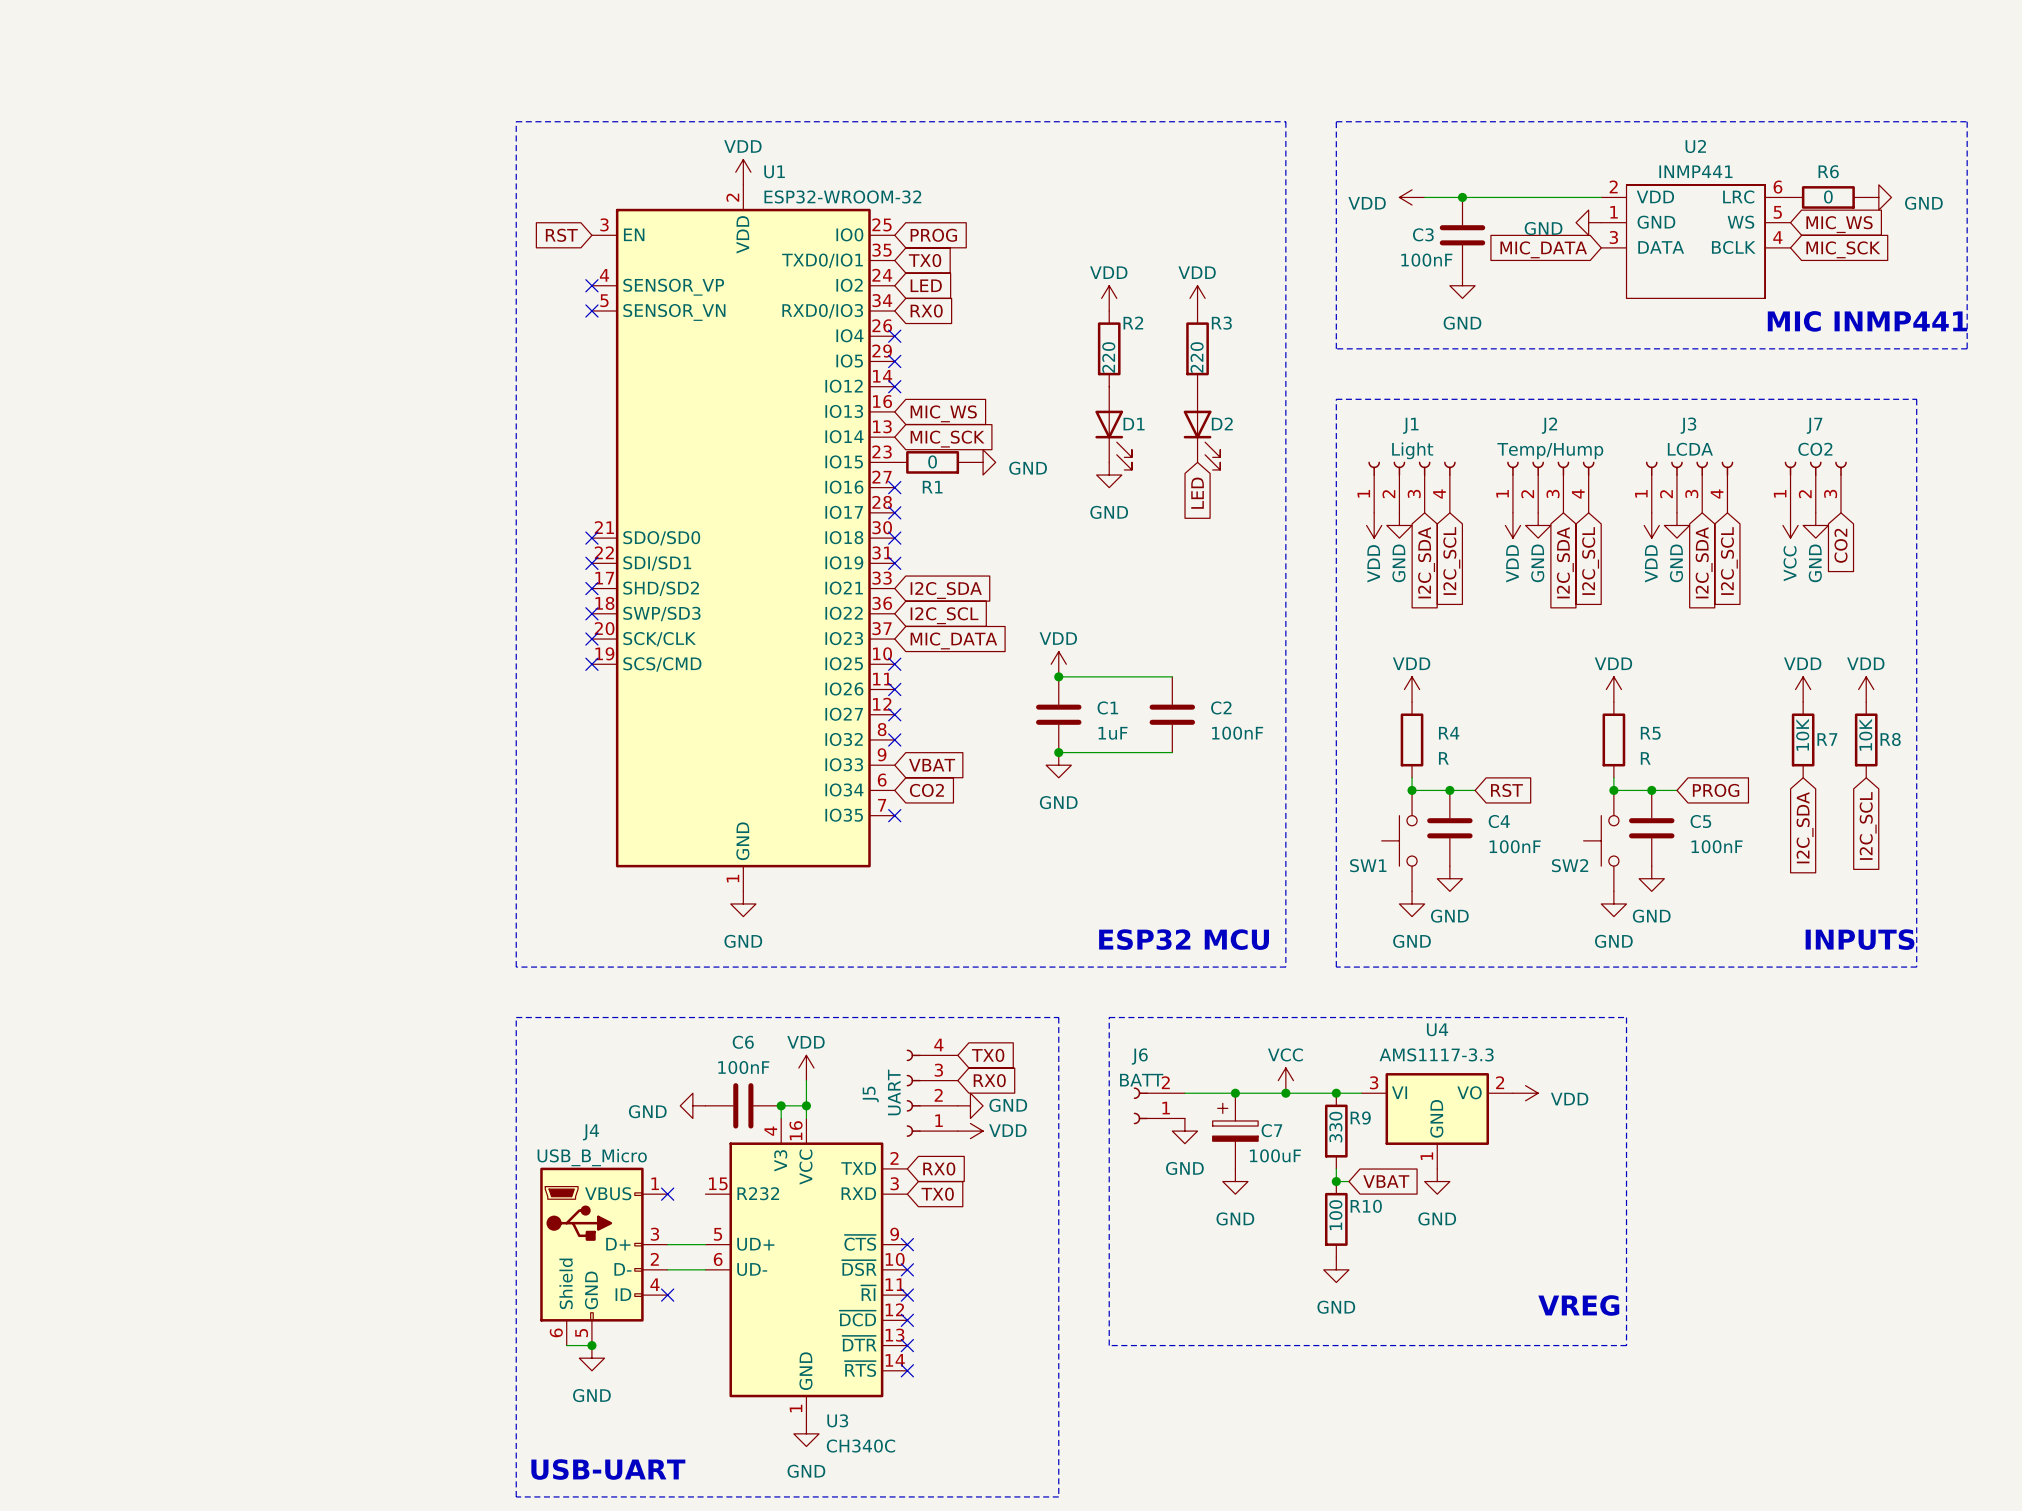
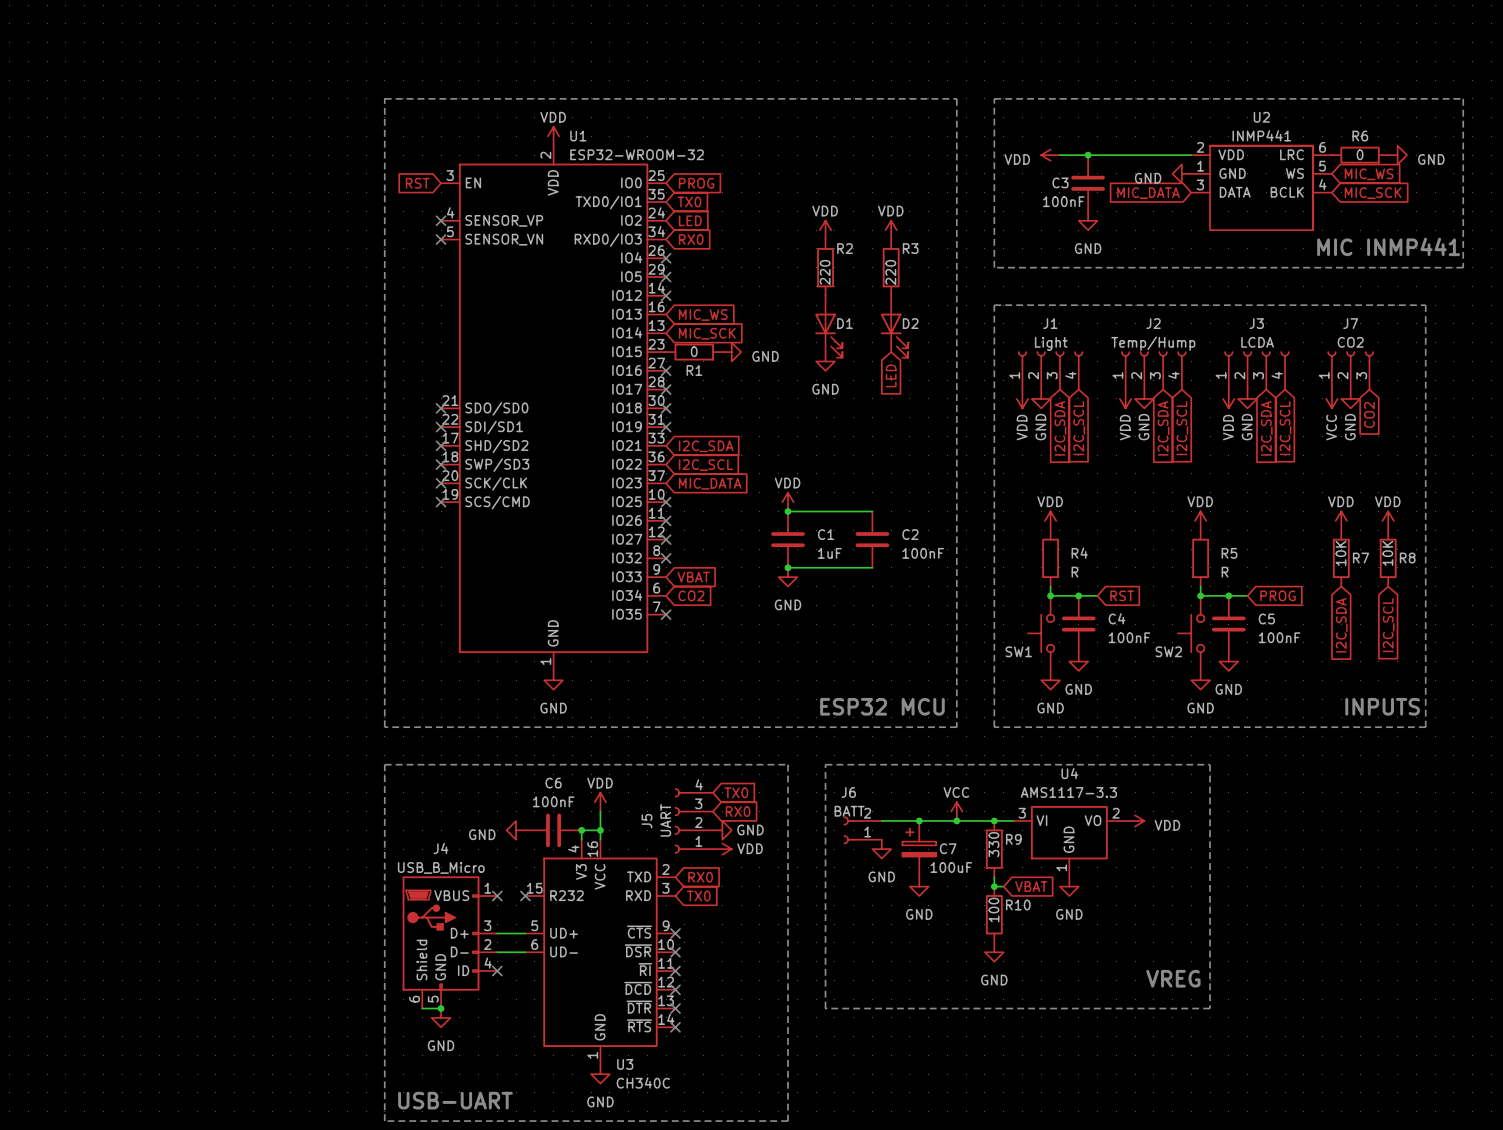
no-connect mark: none -> (525, 895)

